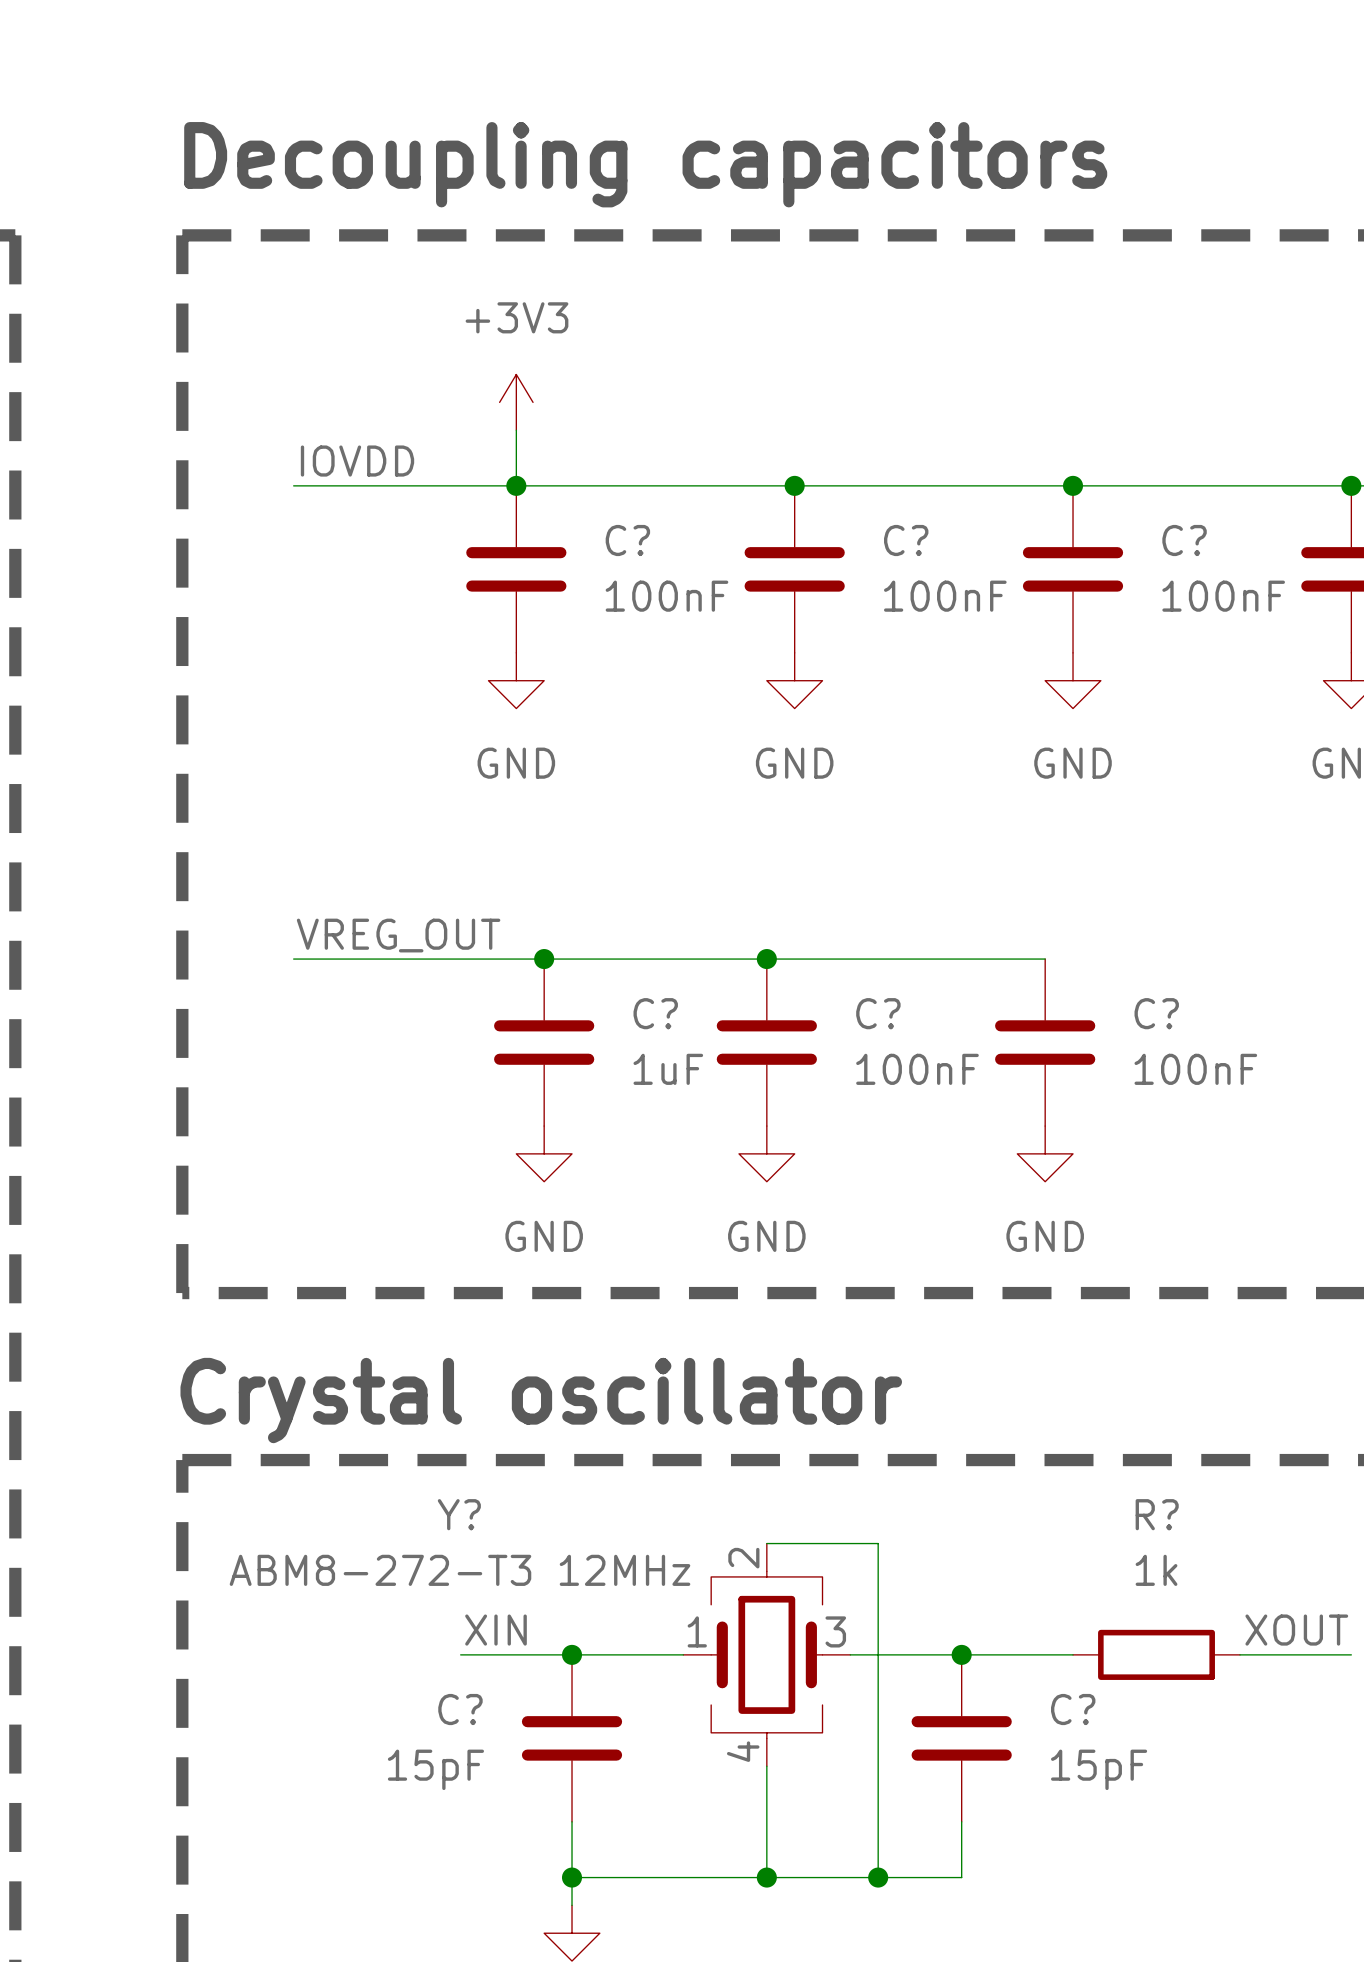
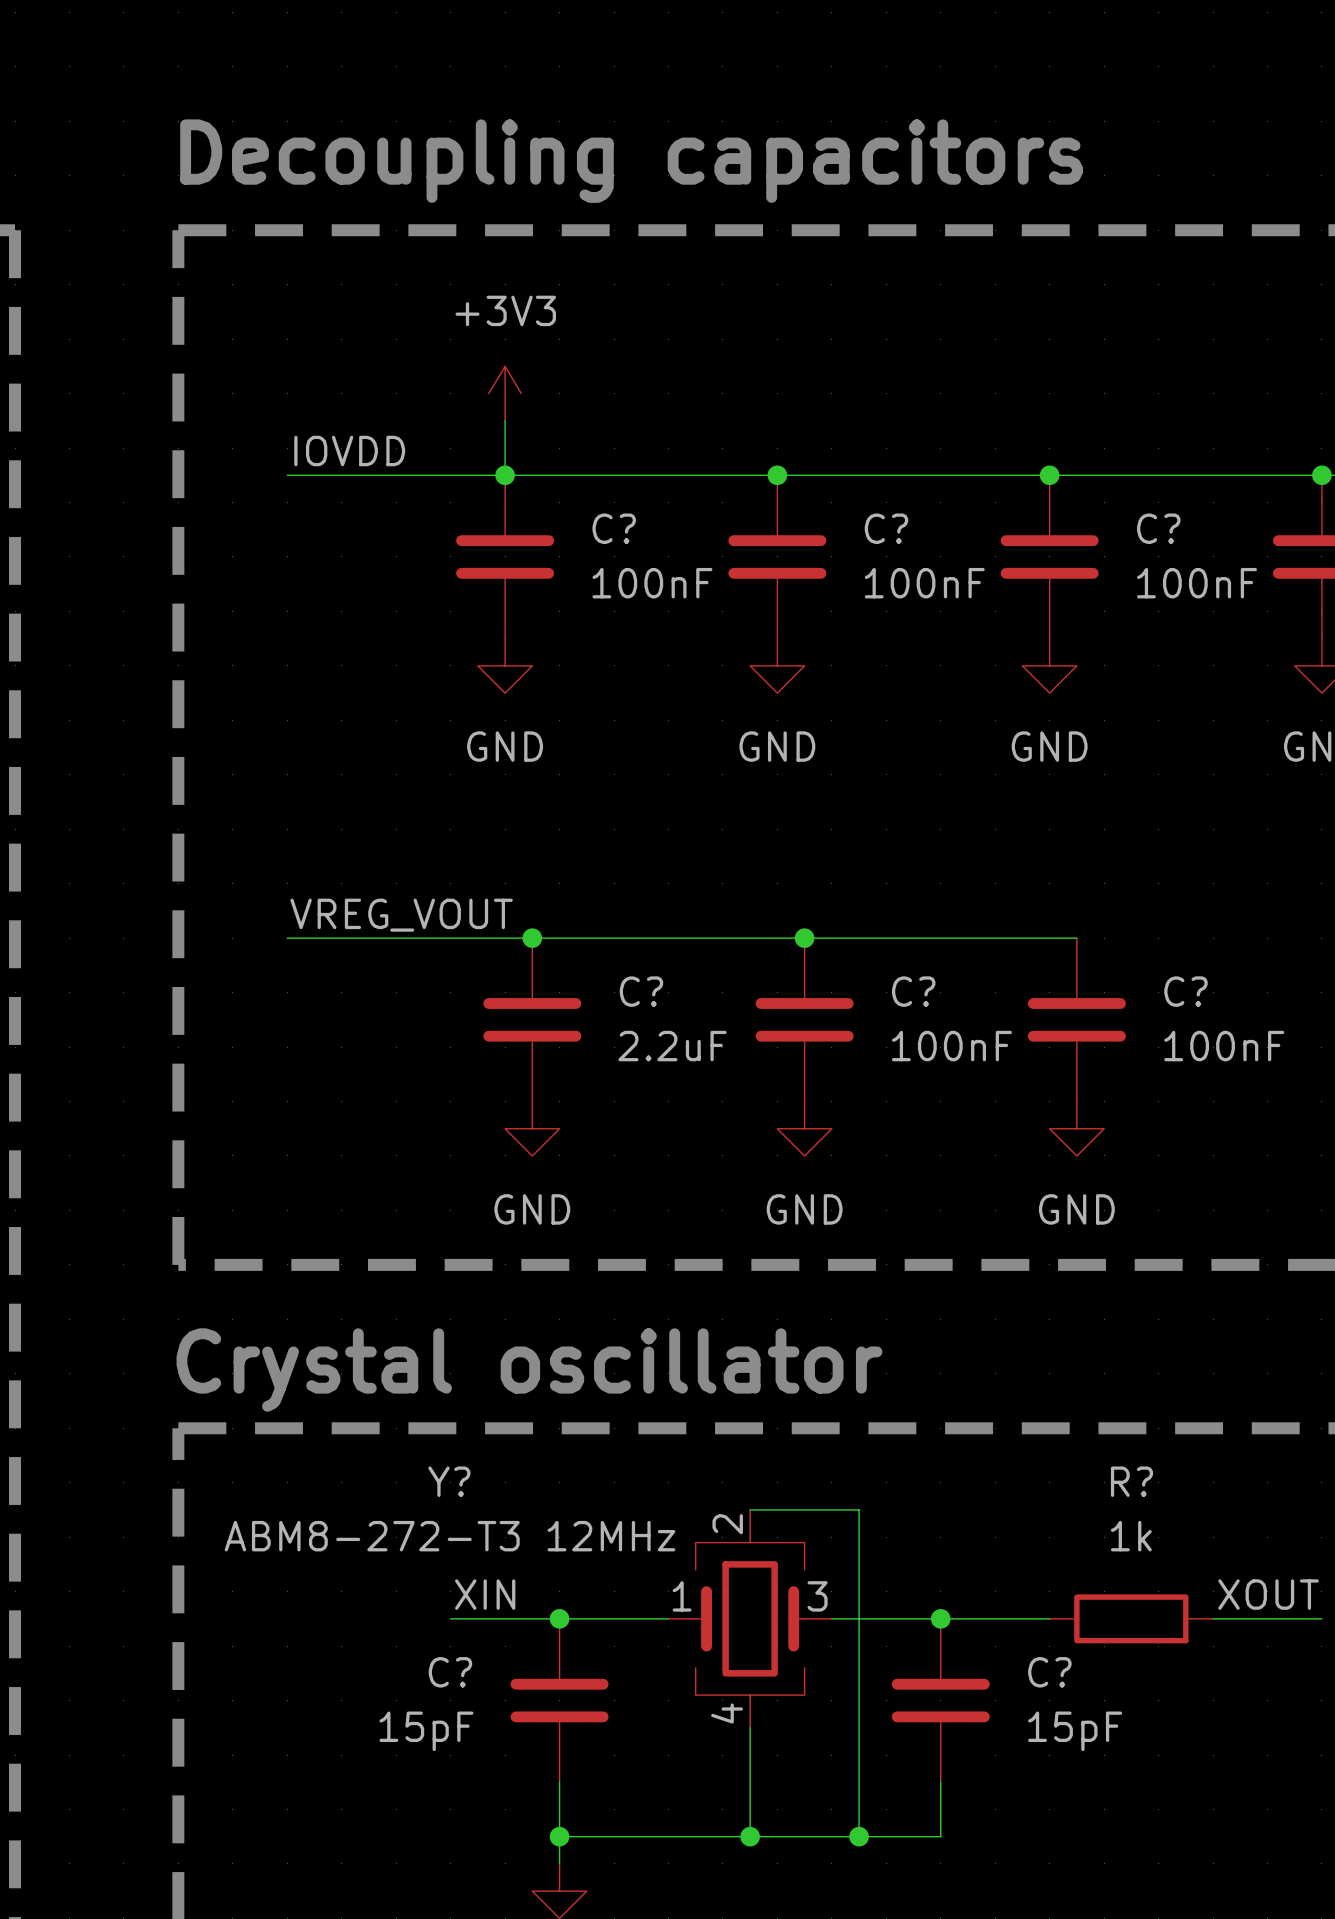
label: VREG_OUT (398, 935) -> VREG_VOUT (401, 915)
junction position: (766, 959) -> (804, 938)
wire: none -> (1022, 938) (1076, 938)
C? position: (766, 1042) -> (804, 1019)
C? position: (1045, 1042) -> (1076, 1019)
C? value: 1uF (668, 1069) -> 2.2uF (672, 1046)
power symbol position: GND (766, 1153) -> GND (804, 1128)
power symbol position: GND (1045, 1153) -> GND (1076, 1128)

